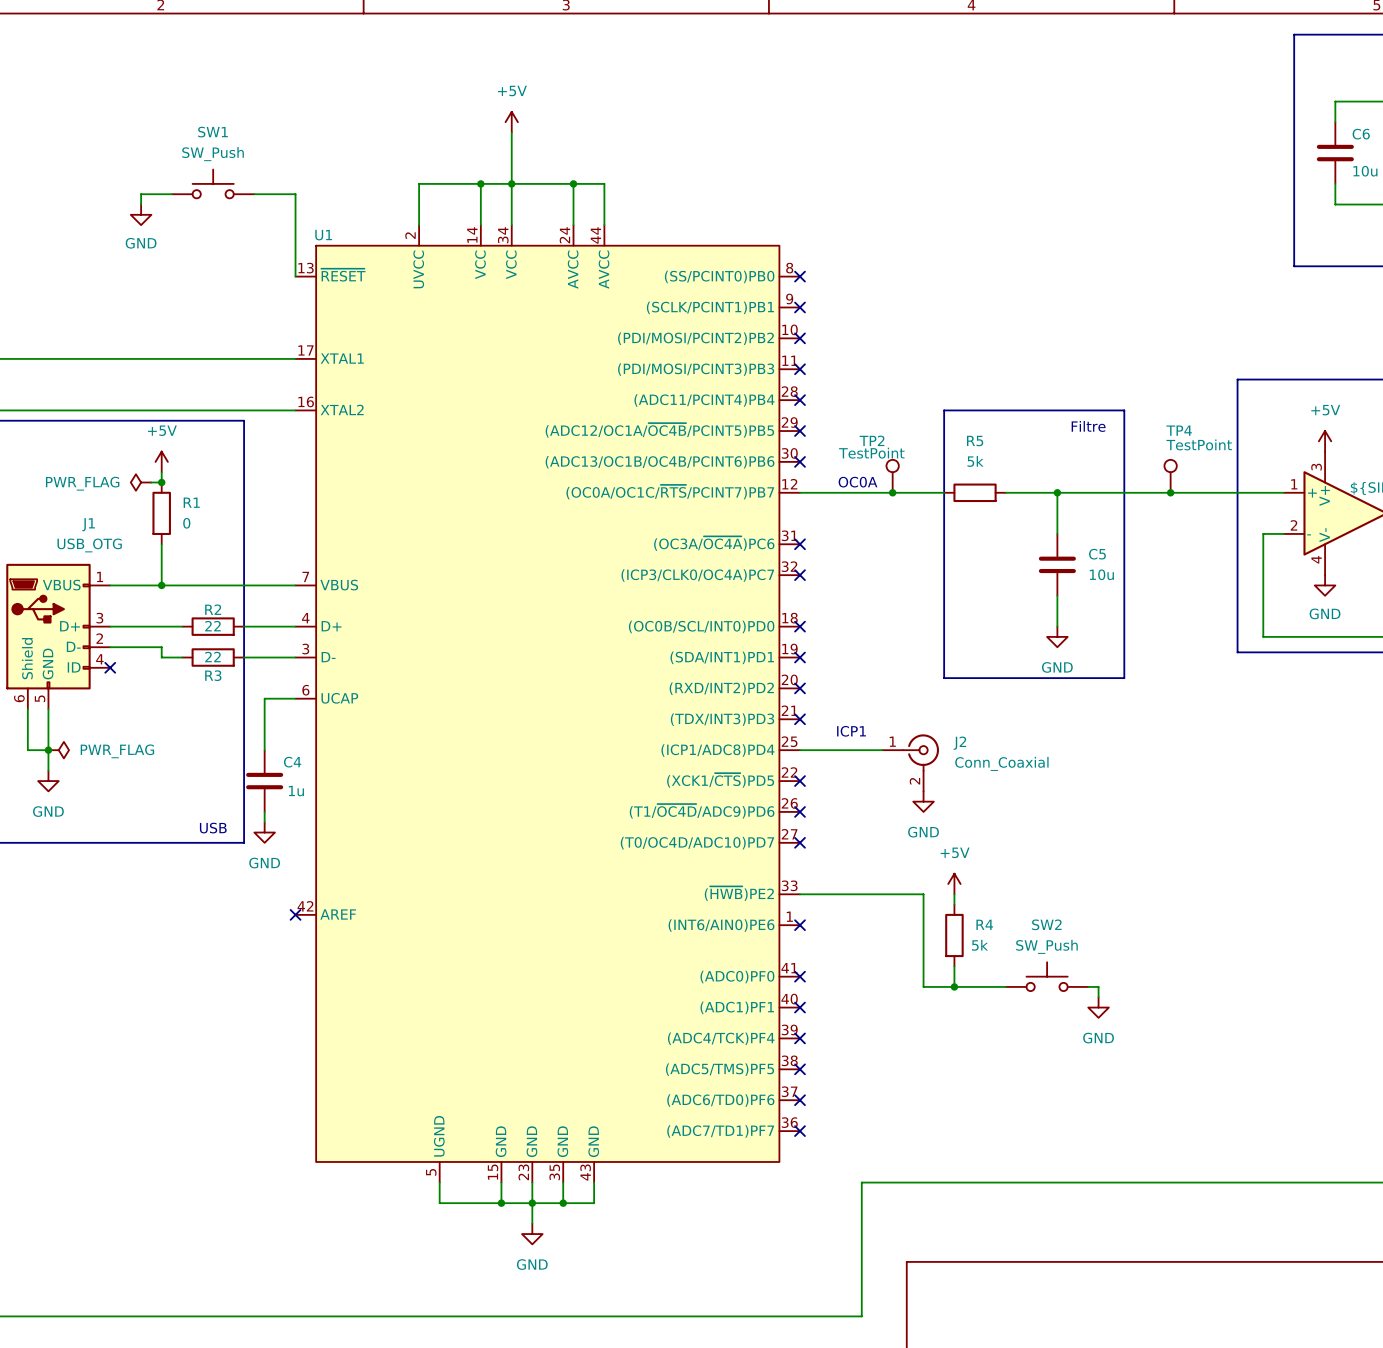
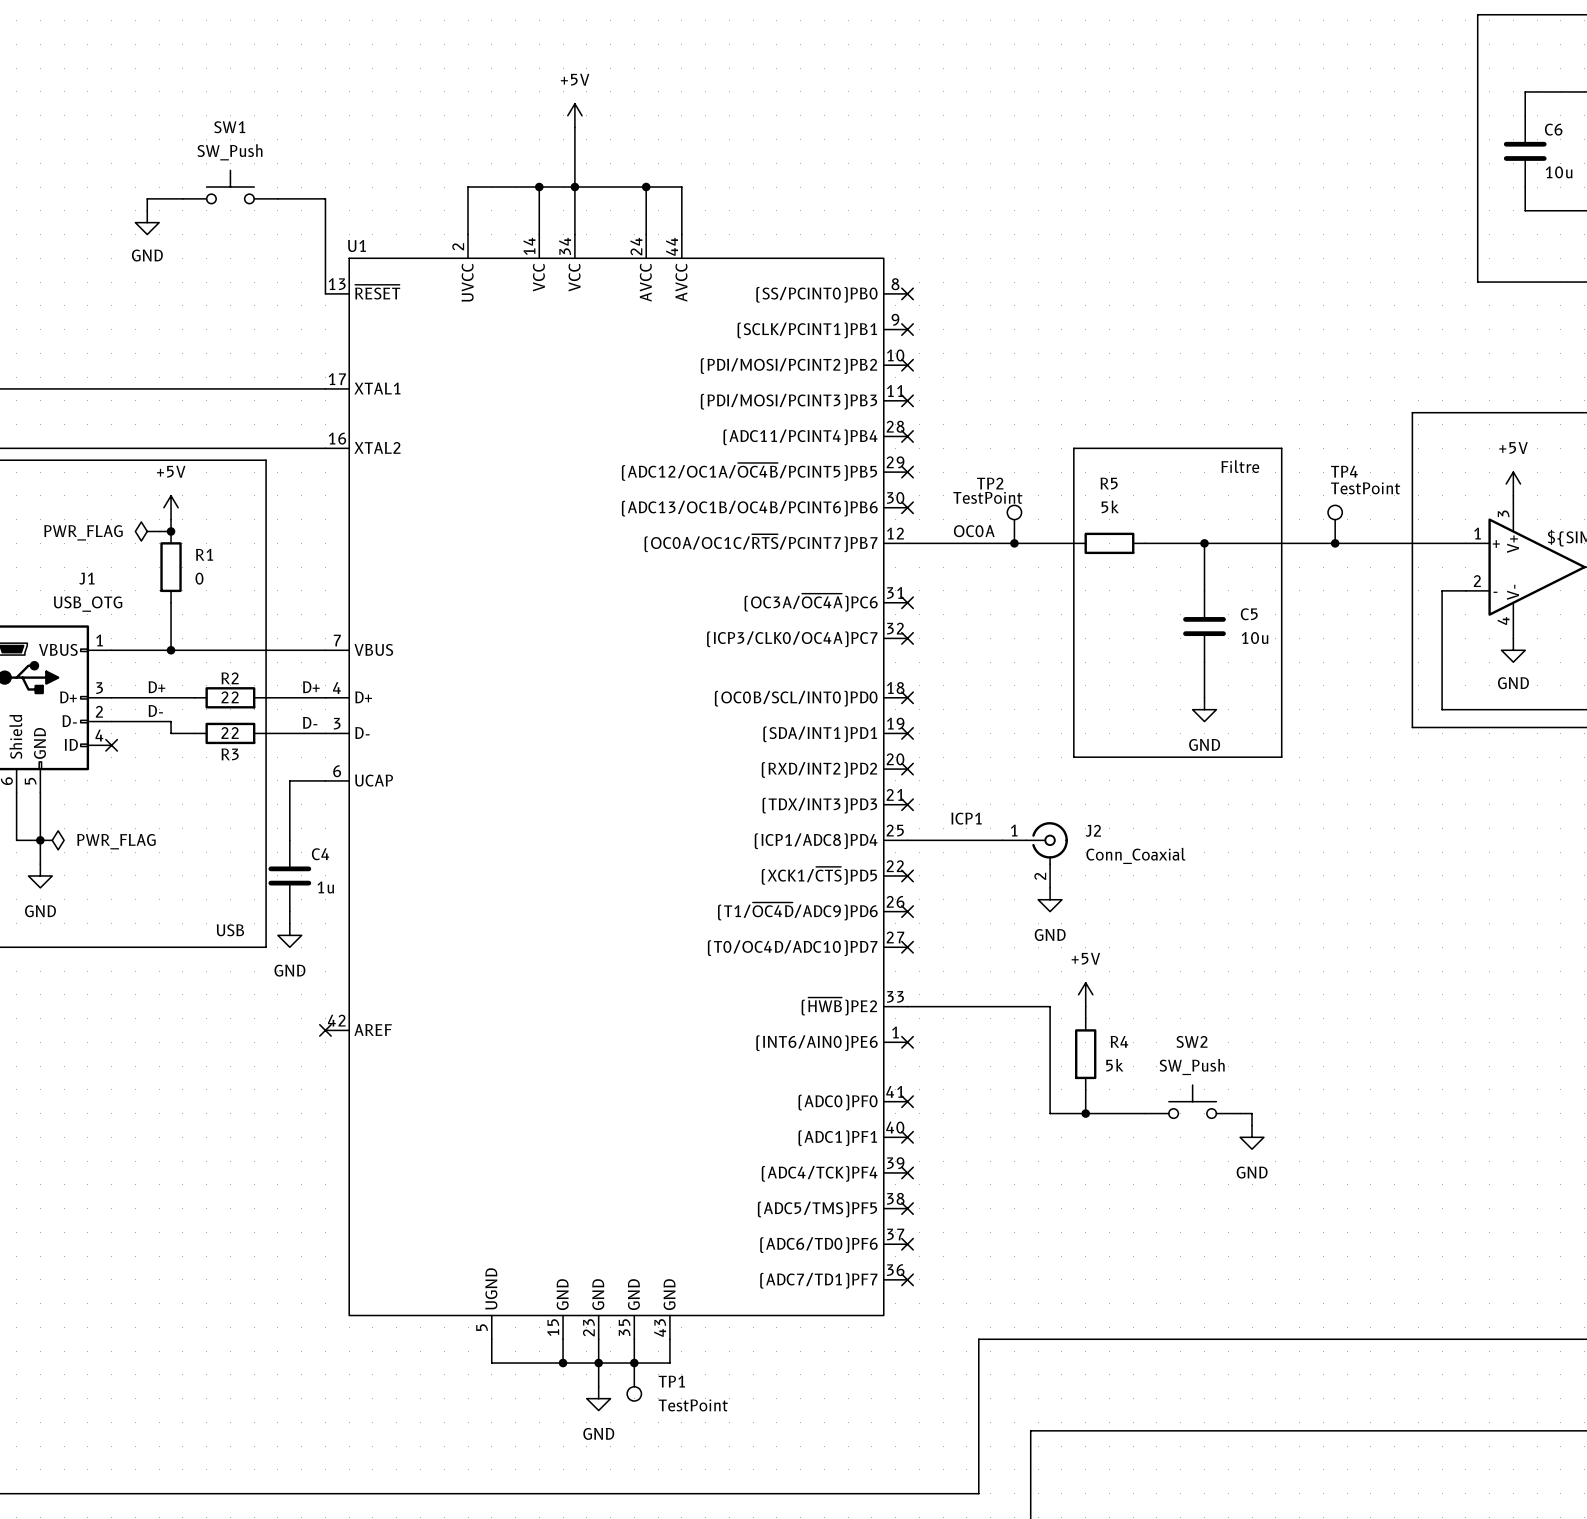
label: none -> D+ (156, 687)
label: none -> D+ (311, 687)
label: none -> D- (155, 710)
label: none -> D- (310, 722)
TP1: none -> TestPoint (634, 1382)

